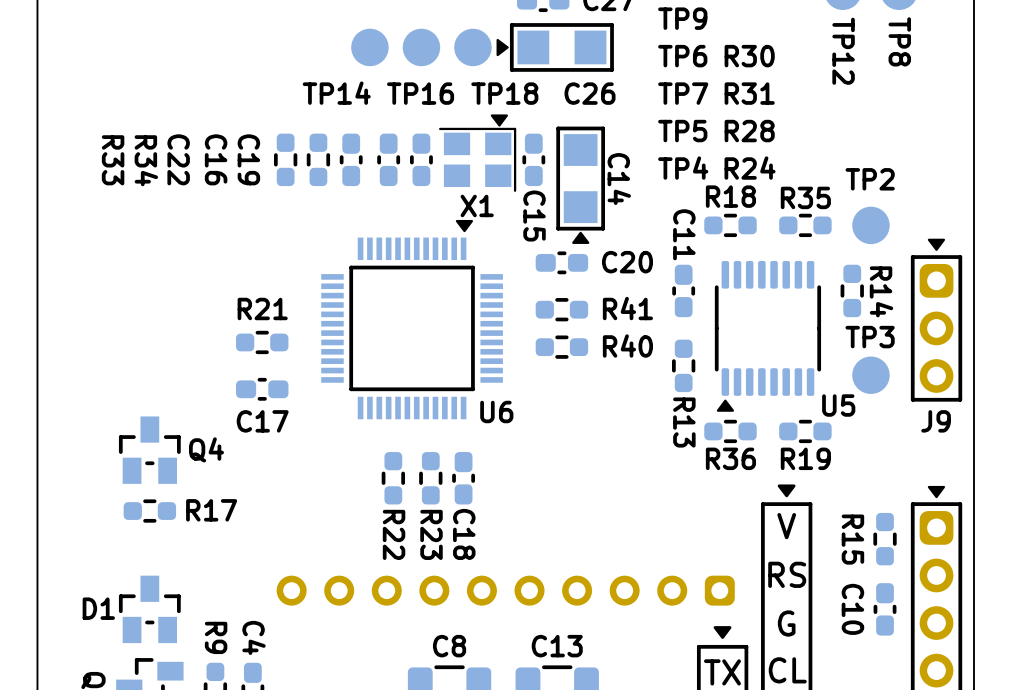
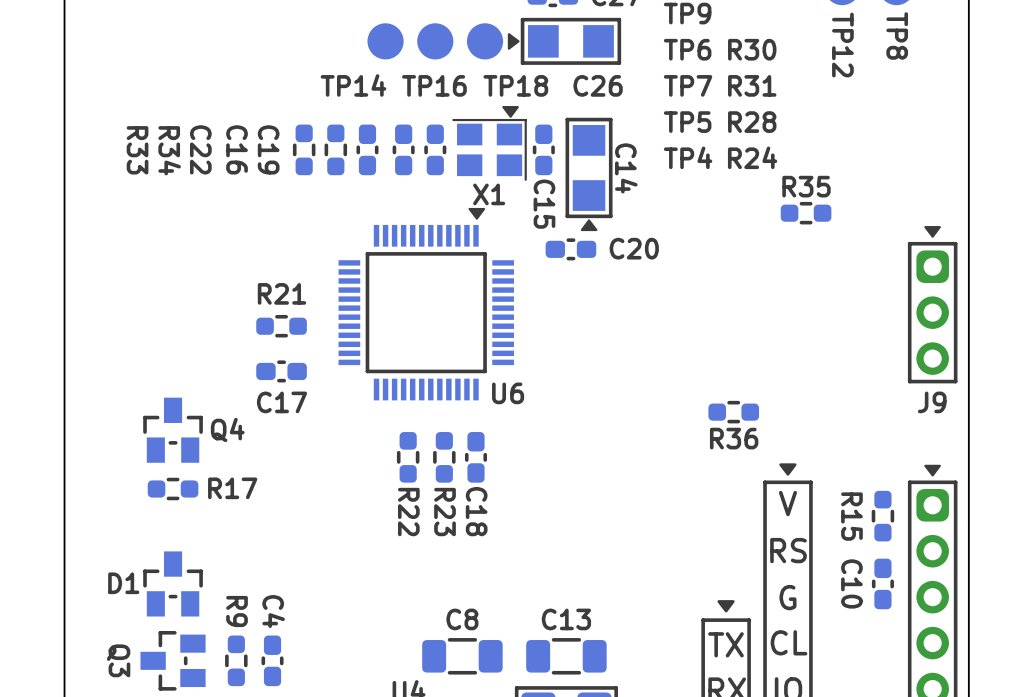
R18: (730, 225) -> none
TP2: (870, 225) -> none
C11: (683, 290) -> none
R14: (852, 290) -> none
R41: (561, 309) -> none
U5: (767, 336) -> none
R40: (561, 347) -> none
R13: (683, 365) -> none
TP3: (870, 375) -> none
R19: (805, 431) -> none
part: (505, 590) -> none

